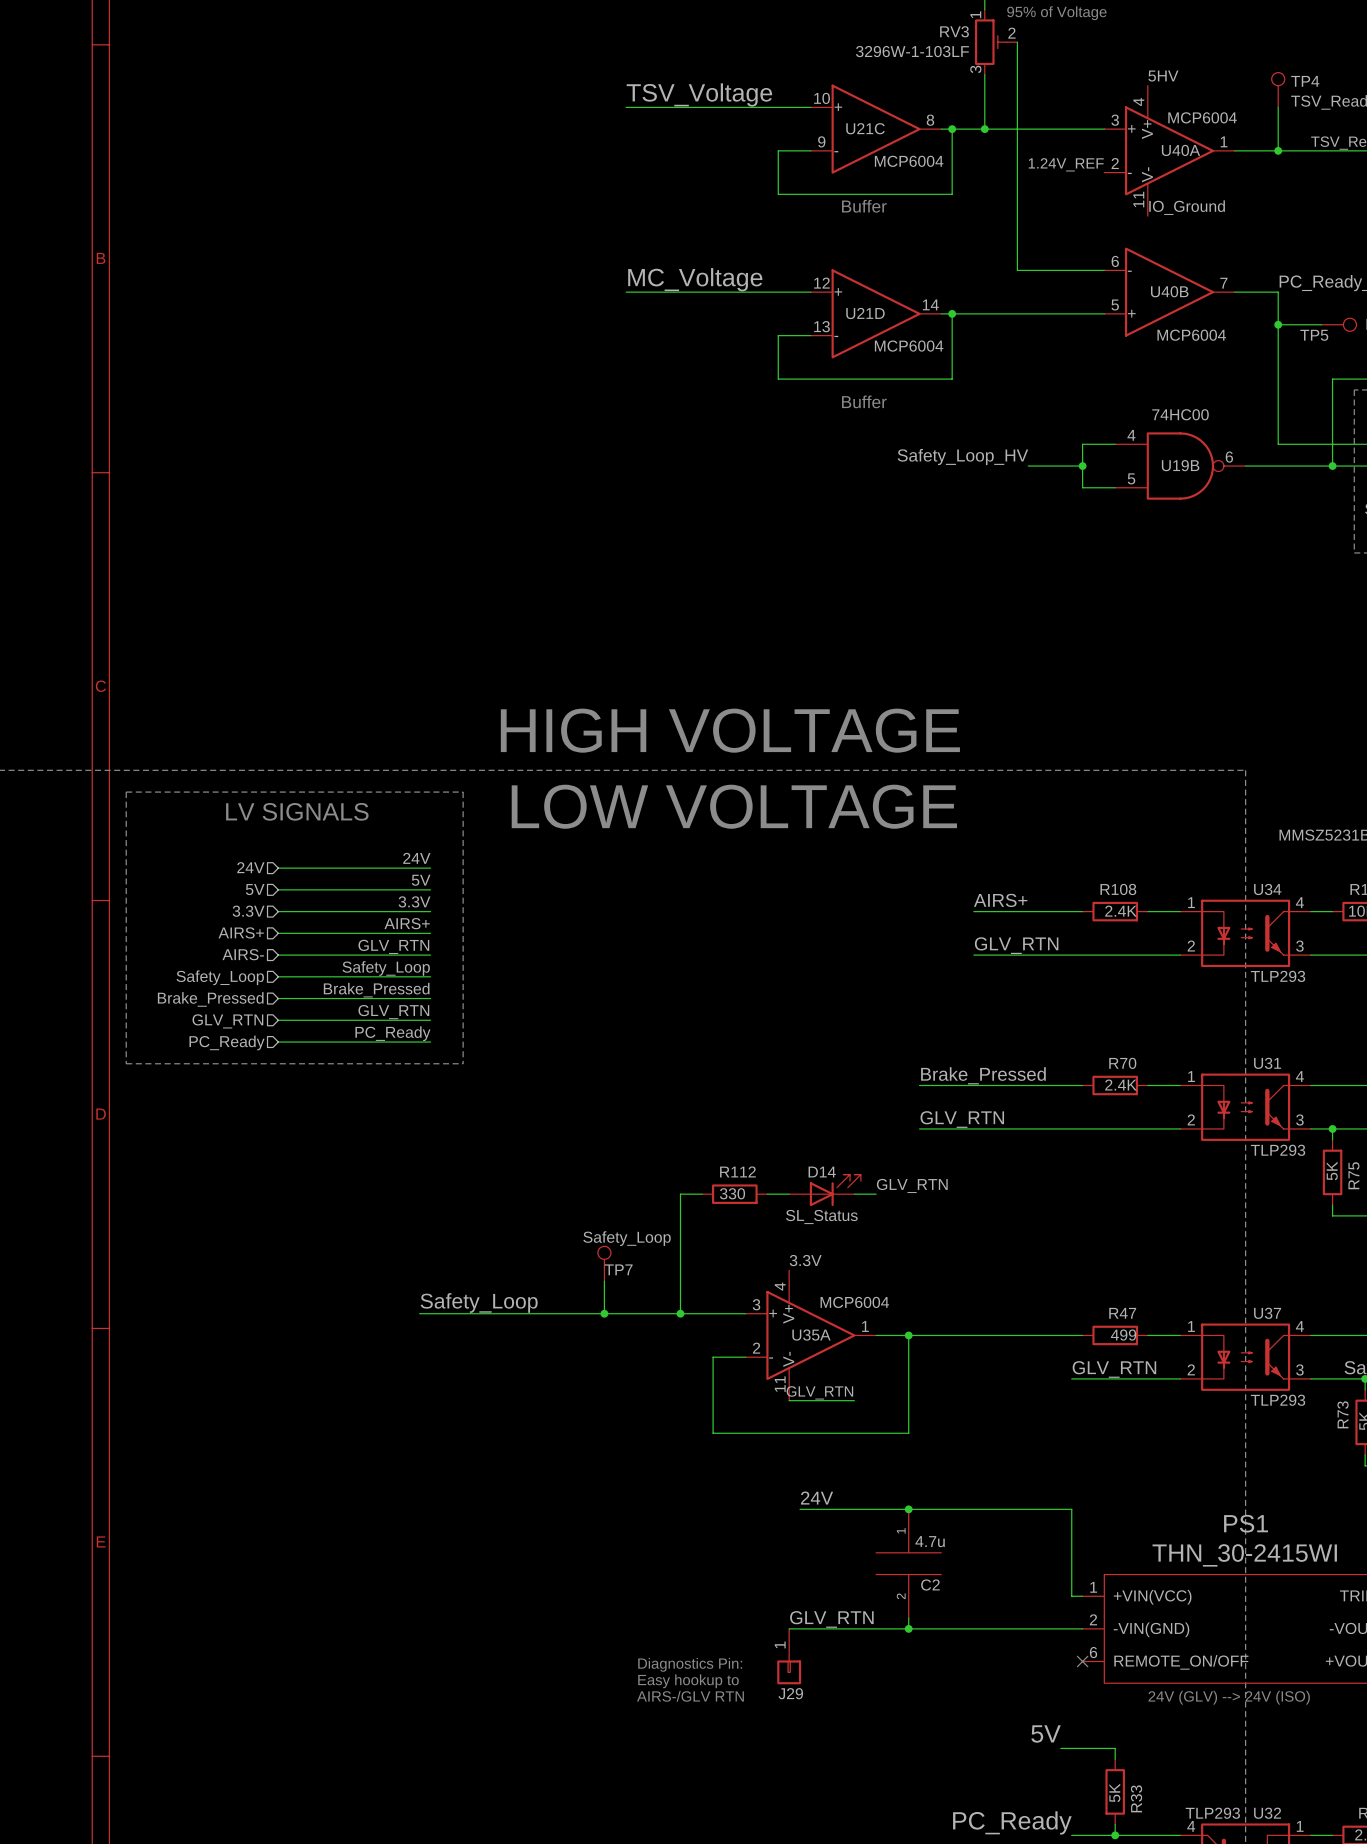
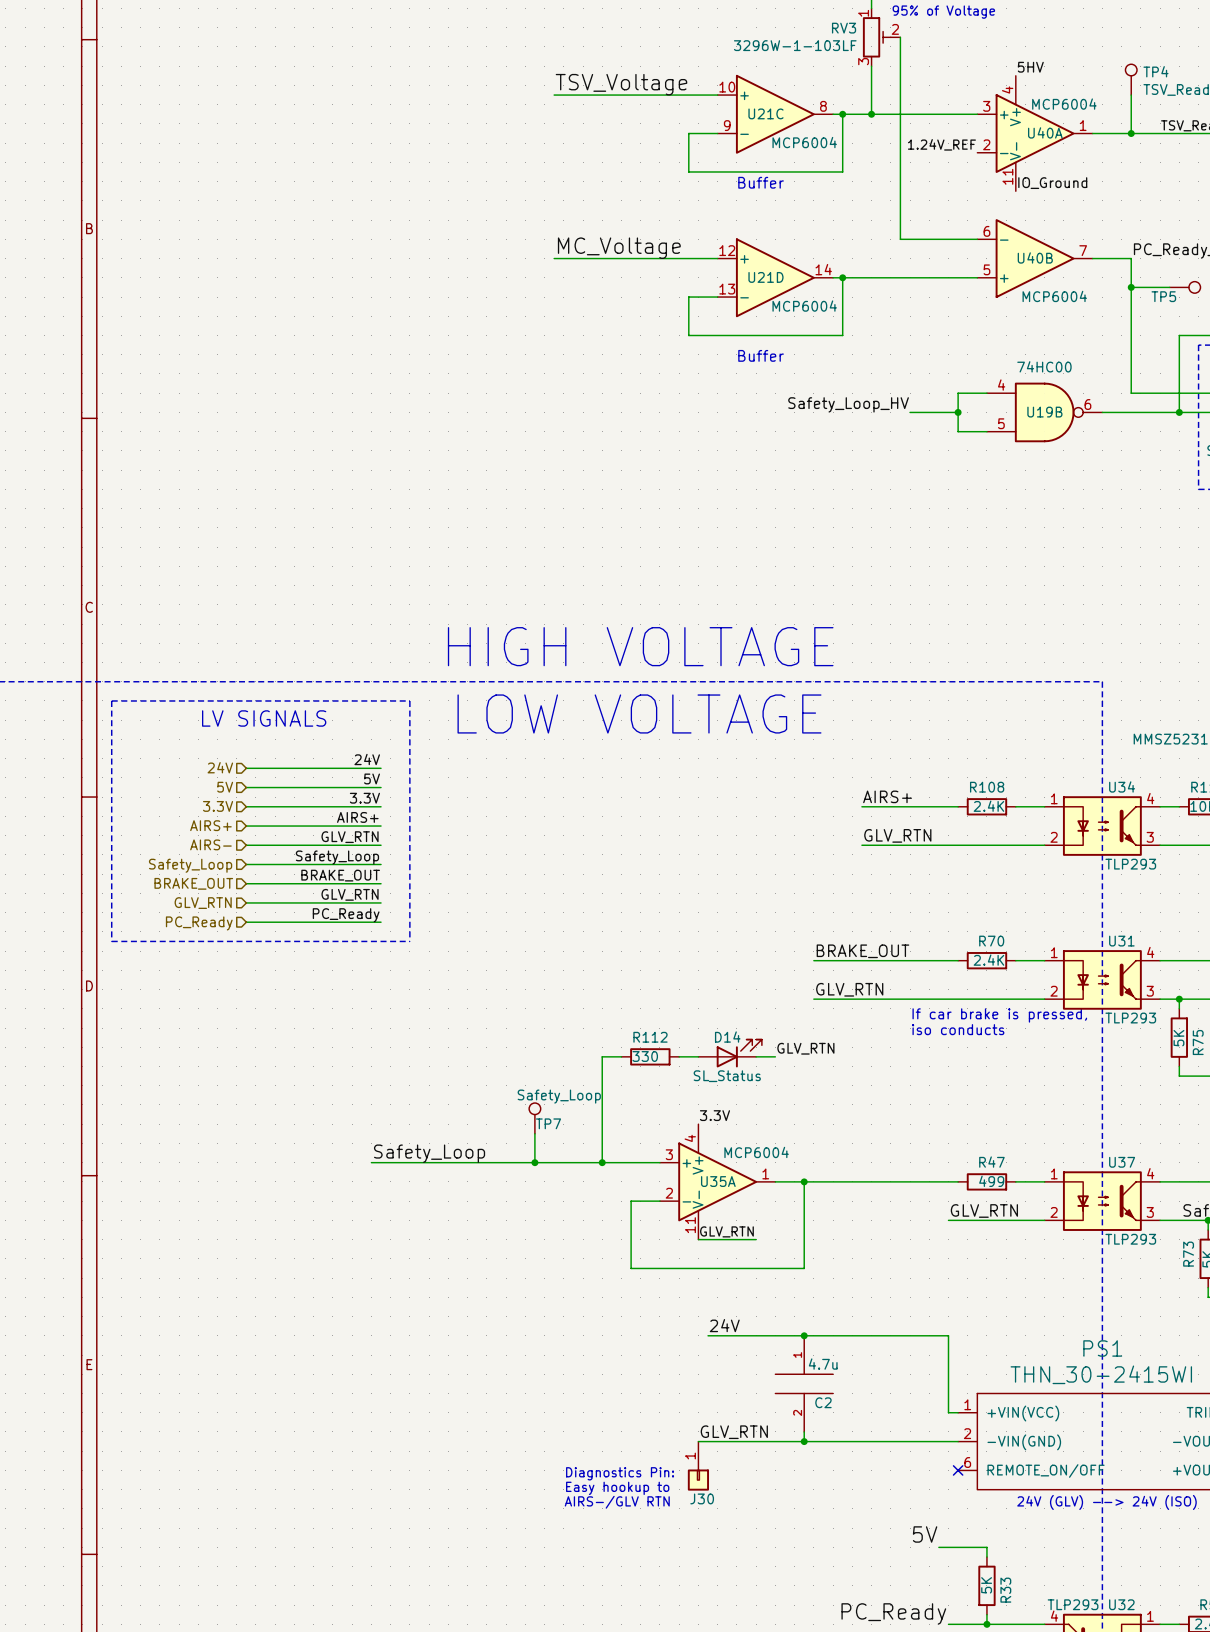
label: Brake_Pressed (376, 990) -> BRAKE_OUT (340, 875)
hierarchical label: Brake_Pressed (210, 999) -> BRAKE_OUT (193, 883)
label: Brake_Pressed (983, 1075) -> BRAKE_OUT (862, 951)
text: none -> If car brake is pressed, (999, 1015)
text: none -> iso conducts (958, 1029)
J29 name: J29 (790, 1693) -> J30 (702, 1498)

